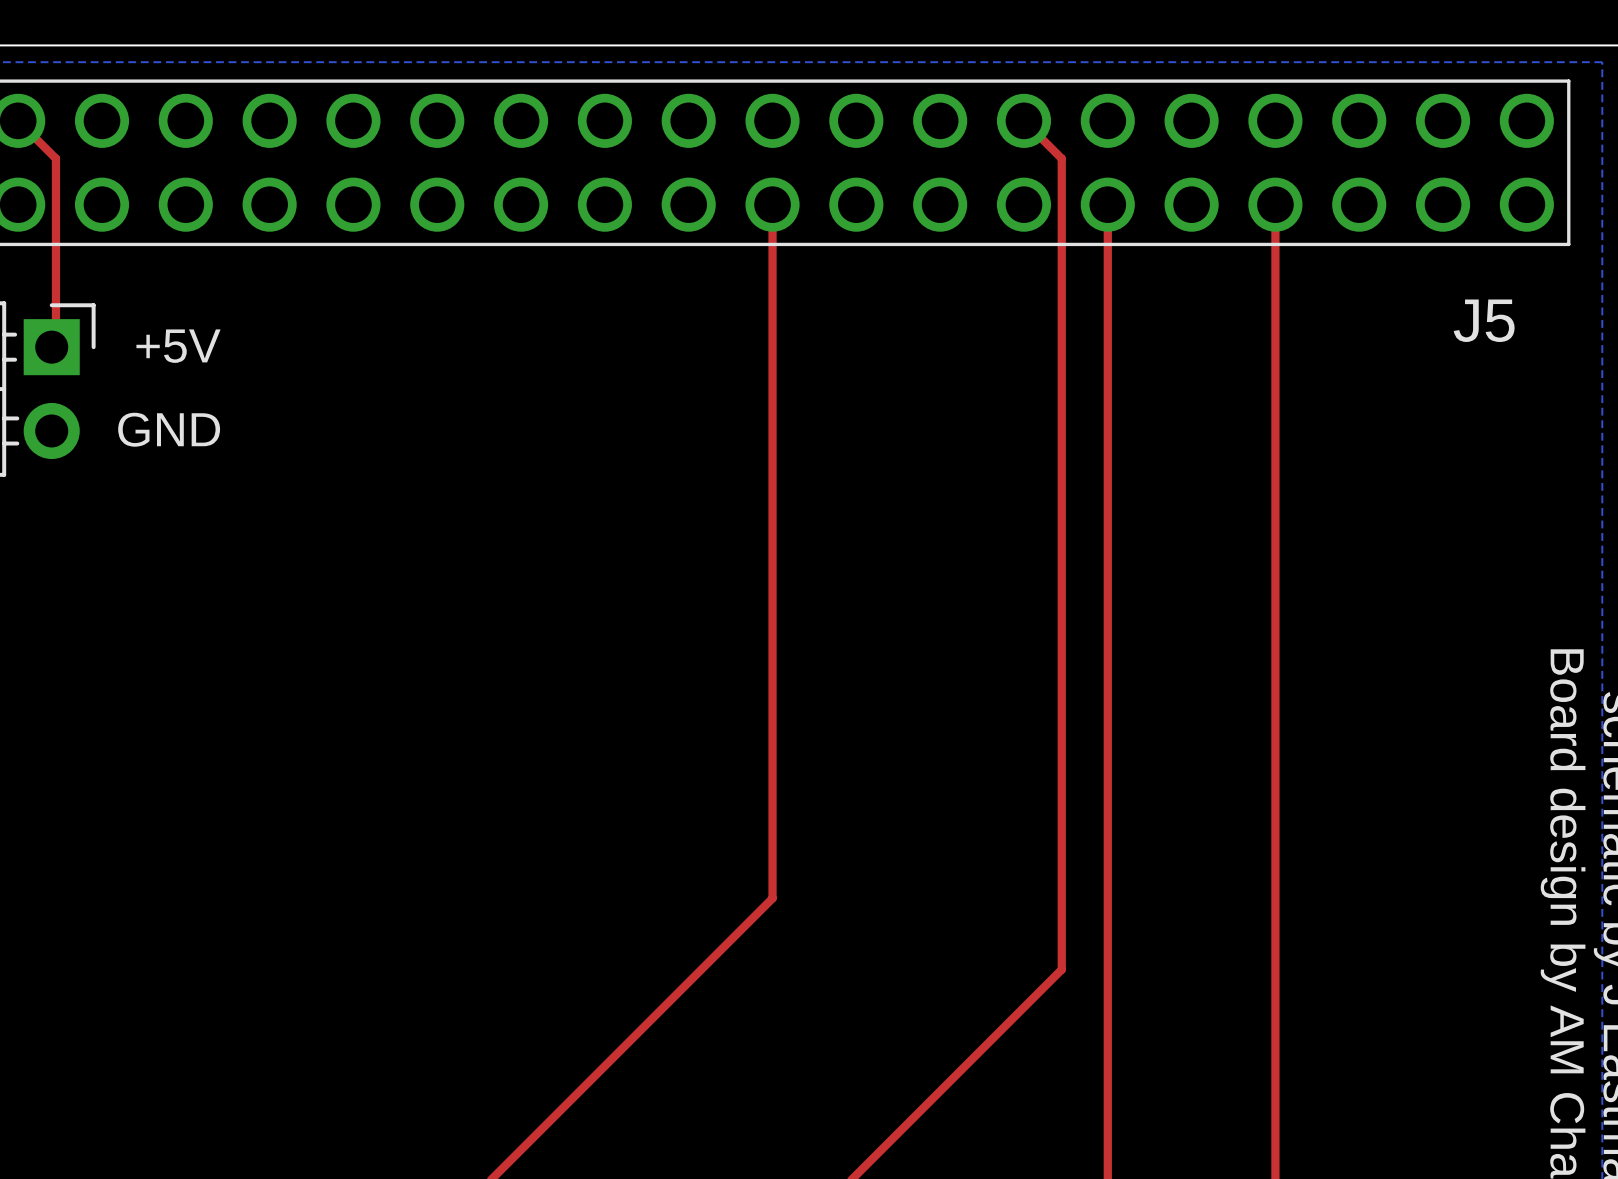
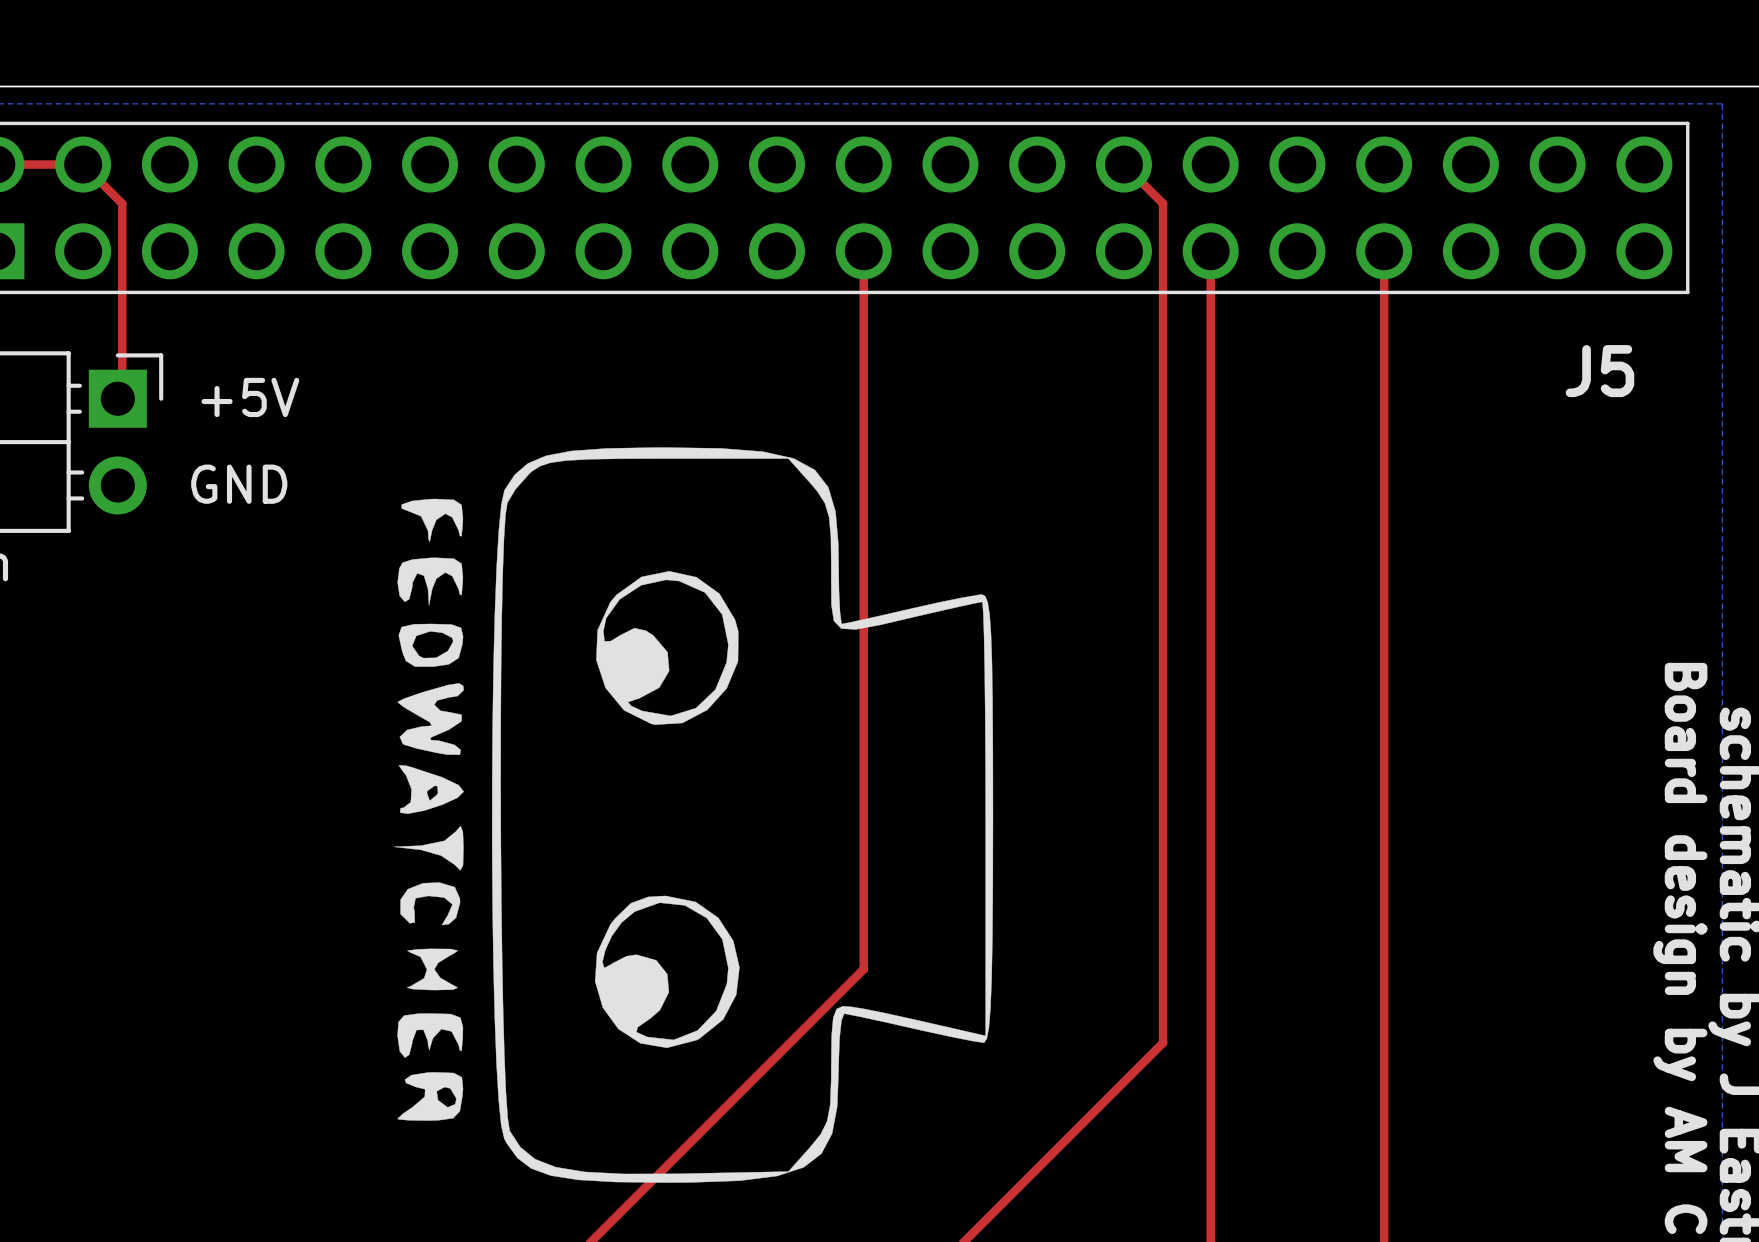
drawing: none -> [393, 447, 994, 1183]

